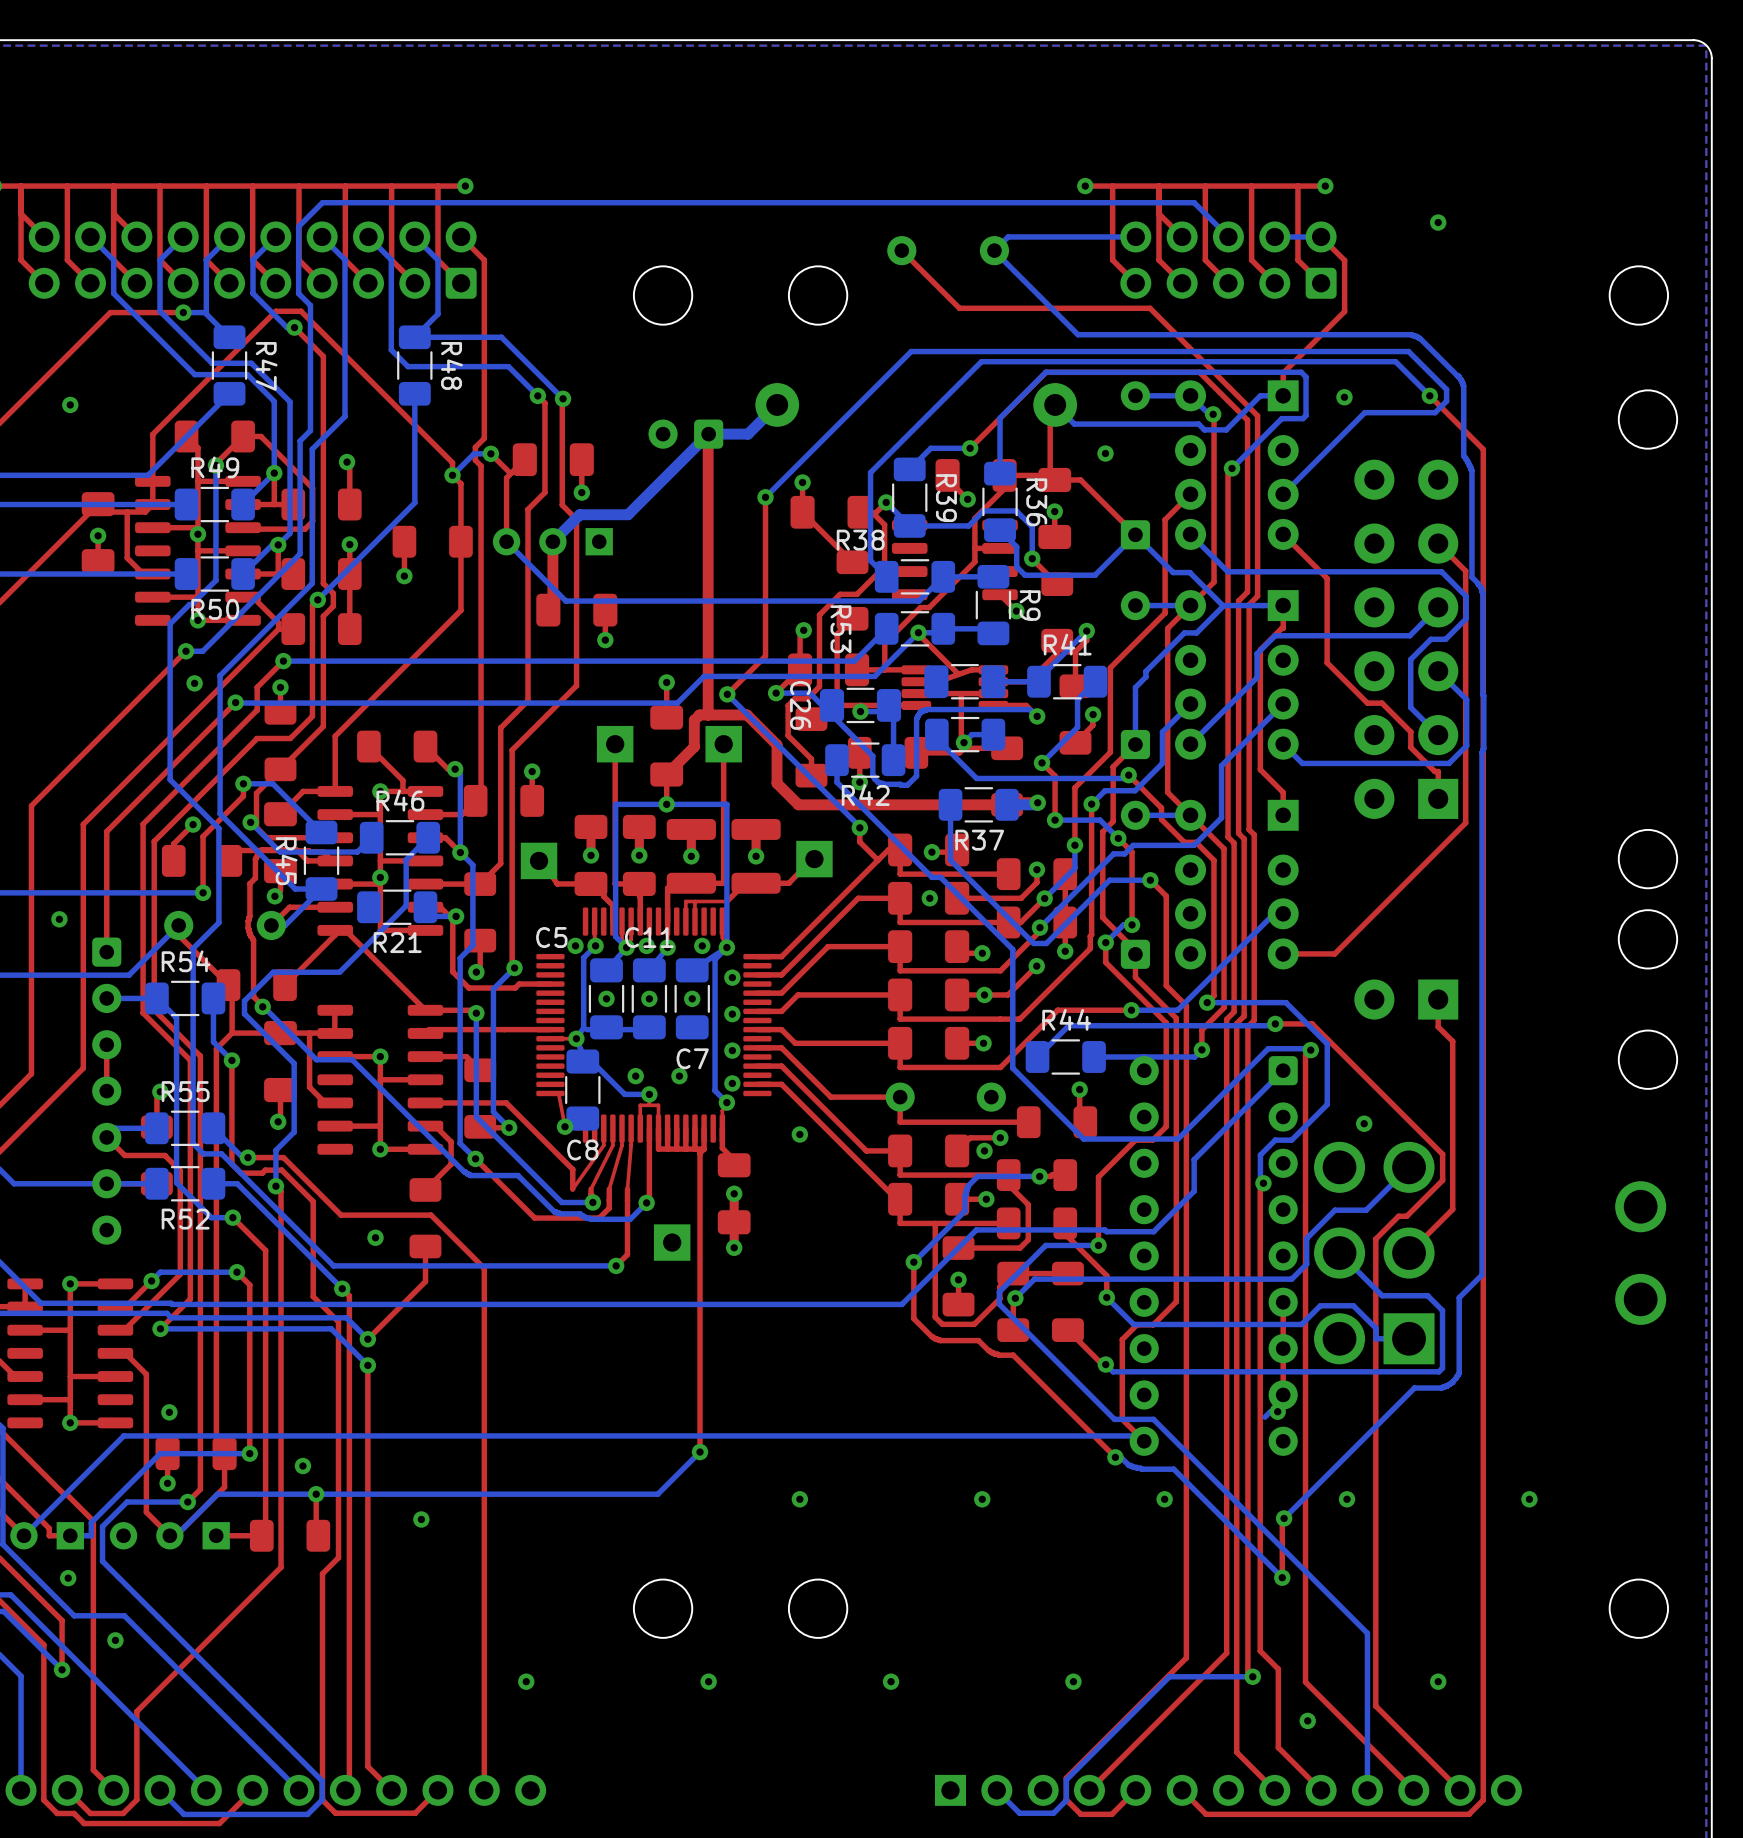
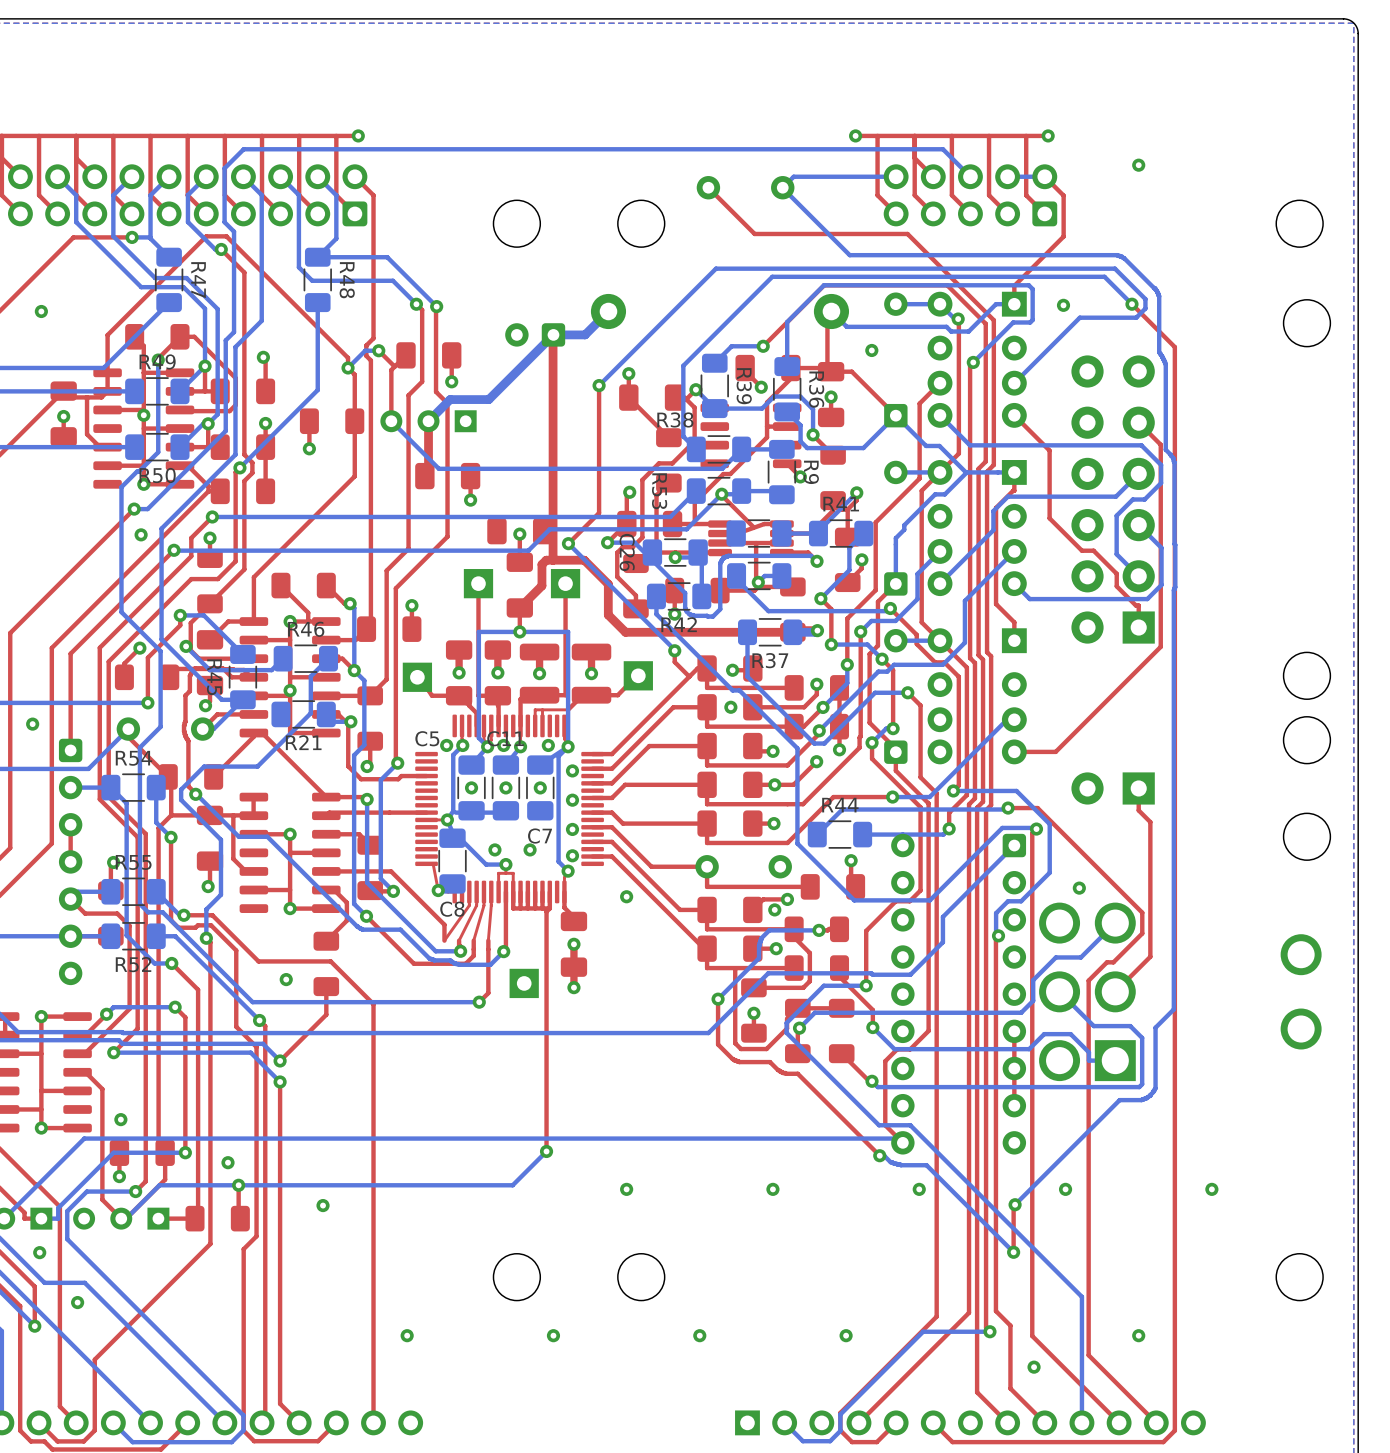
part: none -> (519, 531)
bottom track: (1277, 1411) (1270, 1411) (1264, 1417) -> none
via: (1277, 1411) -> none

